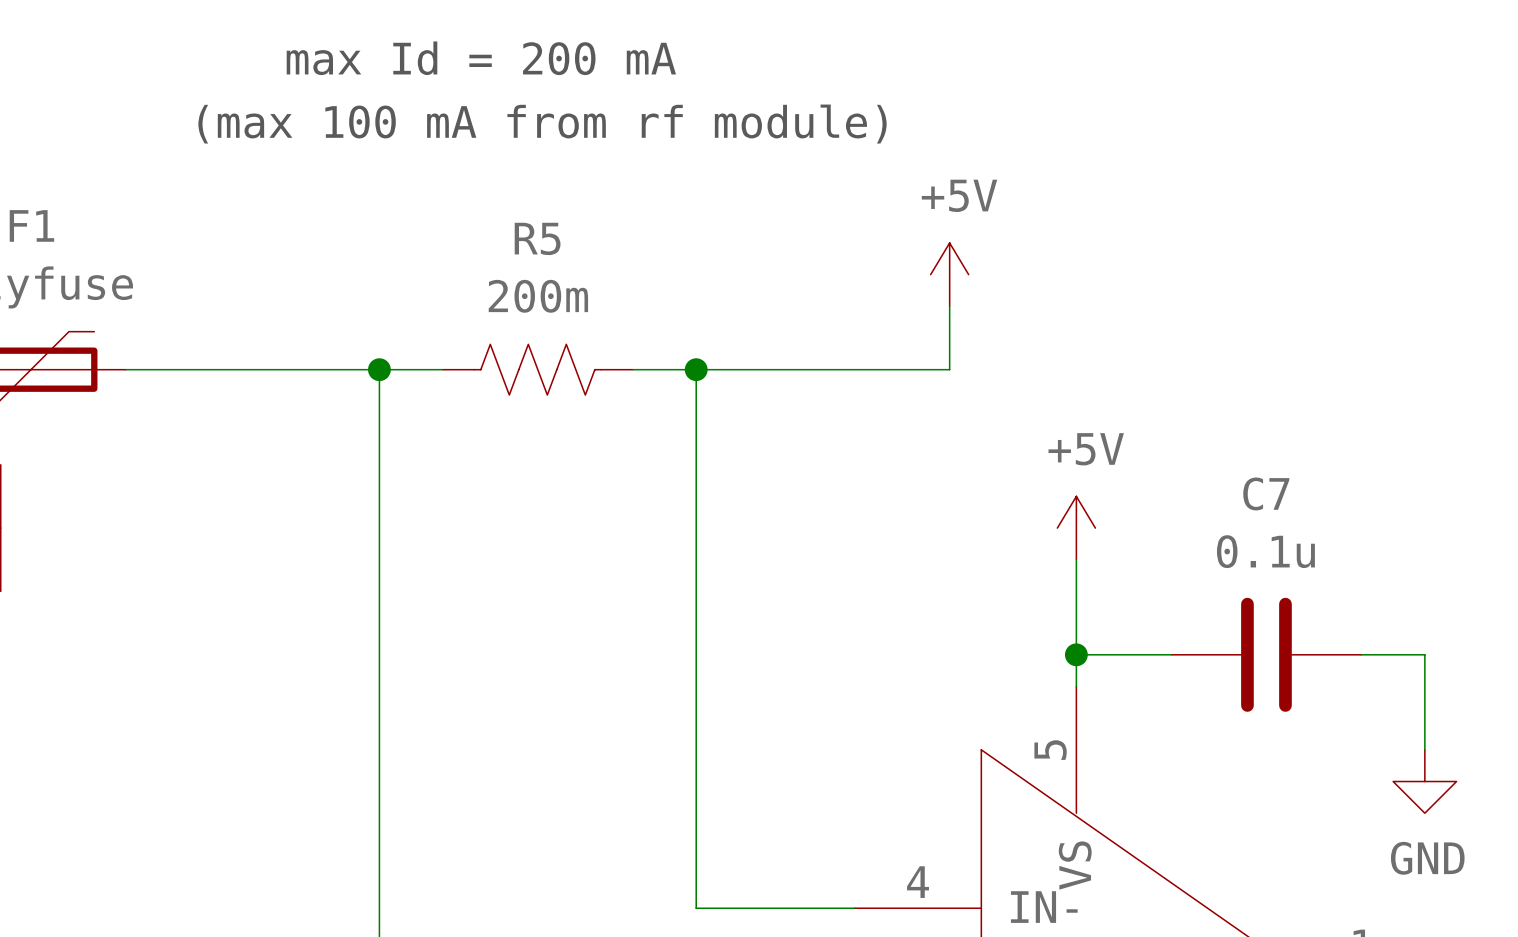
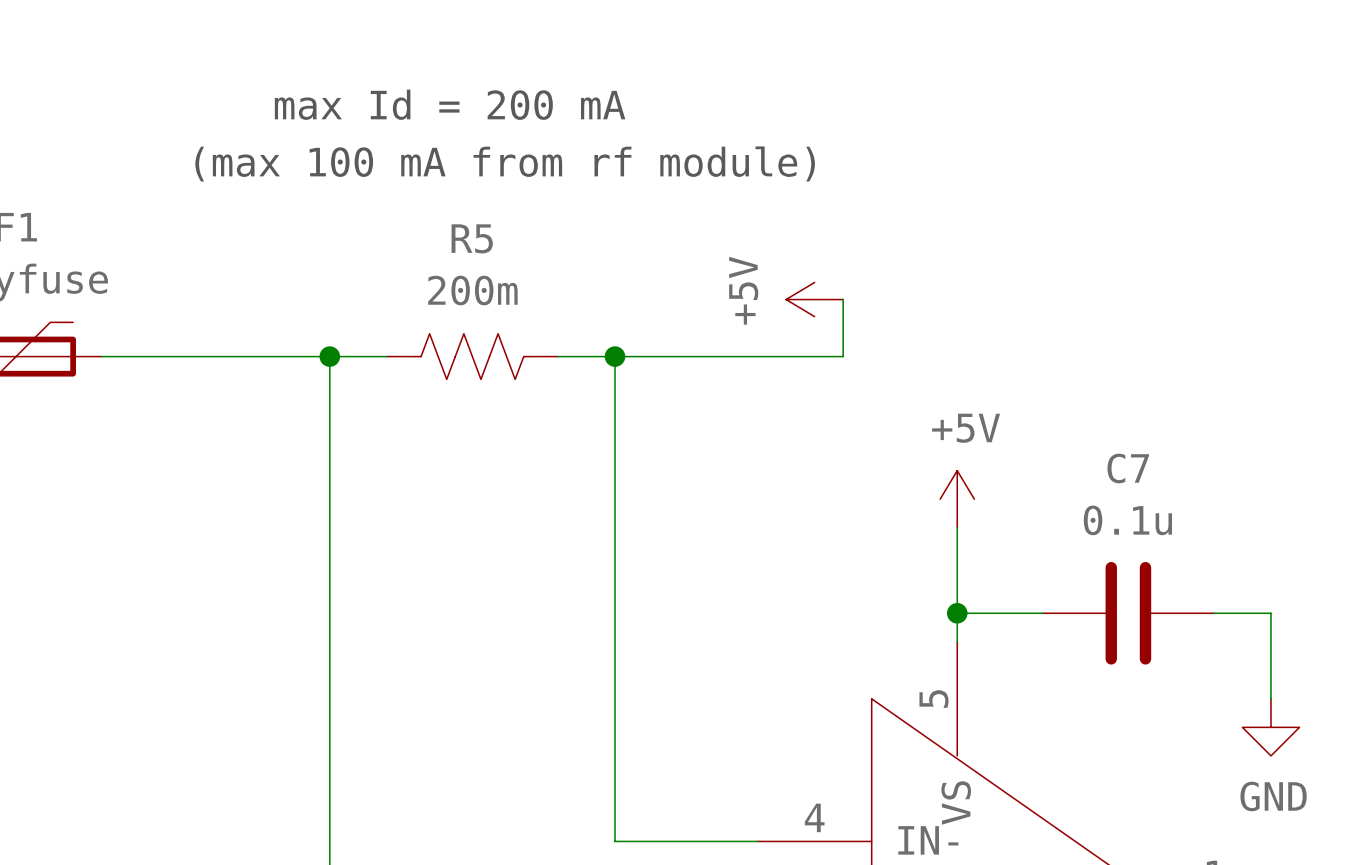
text position: max Id = 200 mA (481, 58) -> max Id = 200 mA (450, 104)
text position: (max 100 mA from rf module) (542, 124) -> (max 100 mA from rf module) (505, 163)
power symbol rotation: 0° (949, 274) -> 90° counterclockwise (814, 299)
power symbol position: +5V (949, 274) -> +5V (814, 299)

